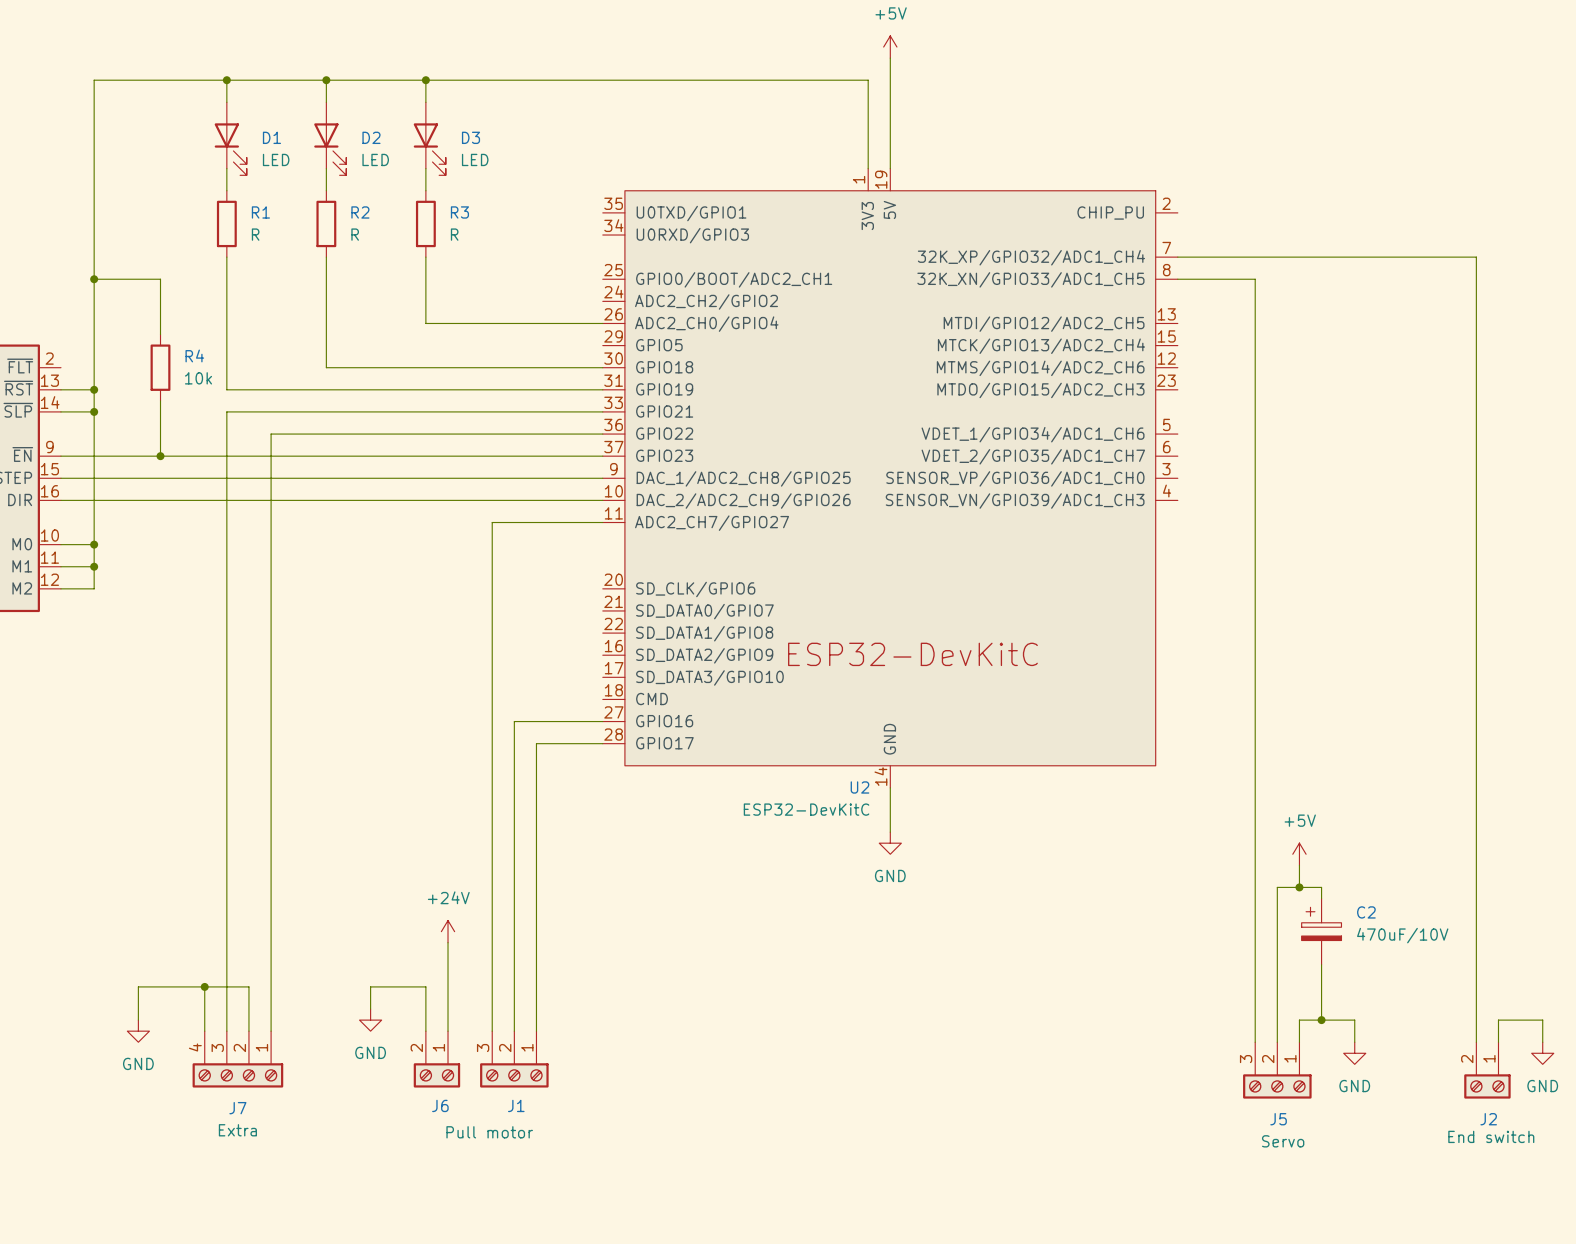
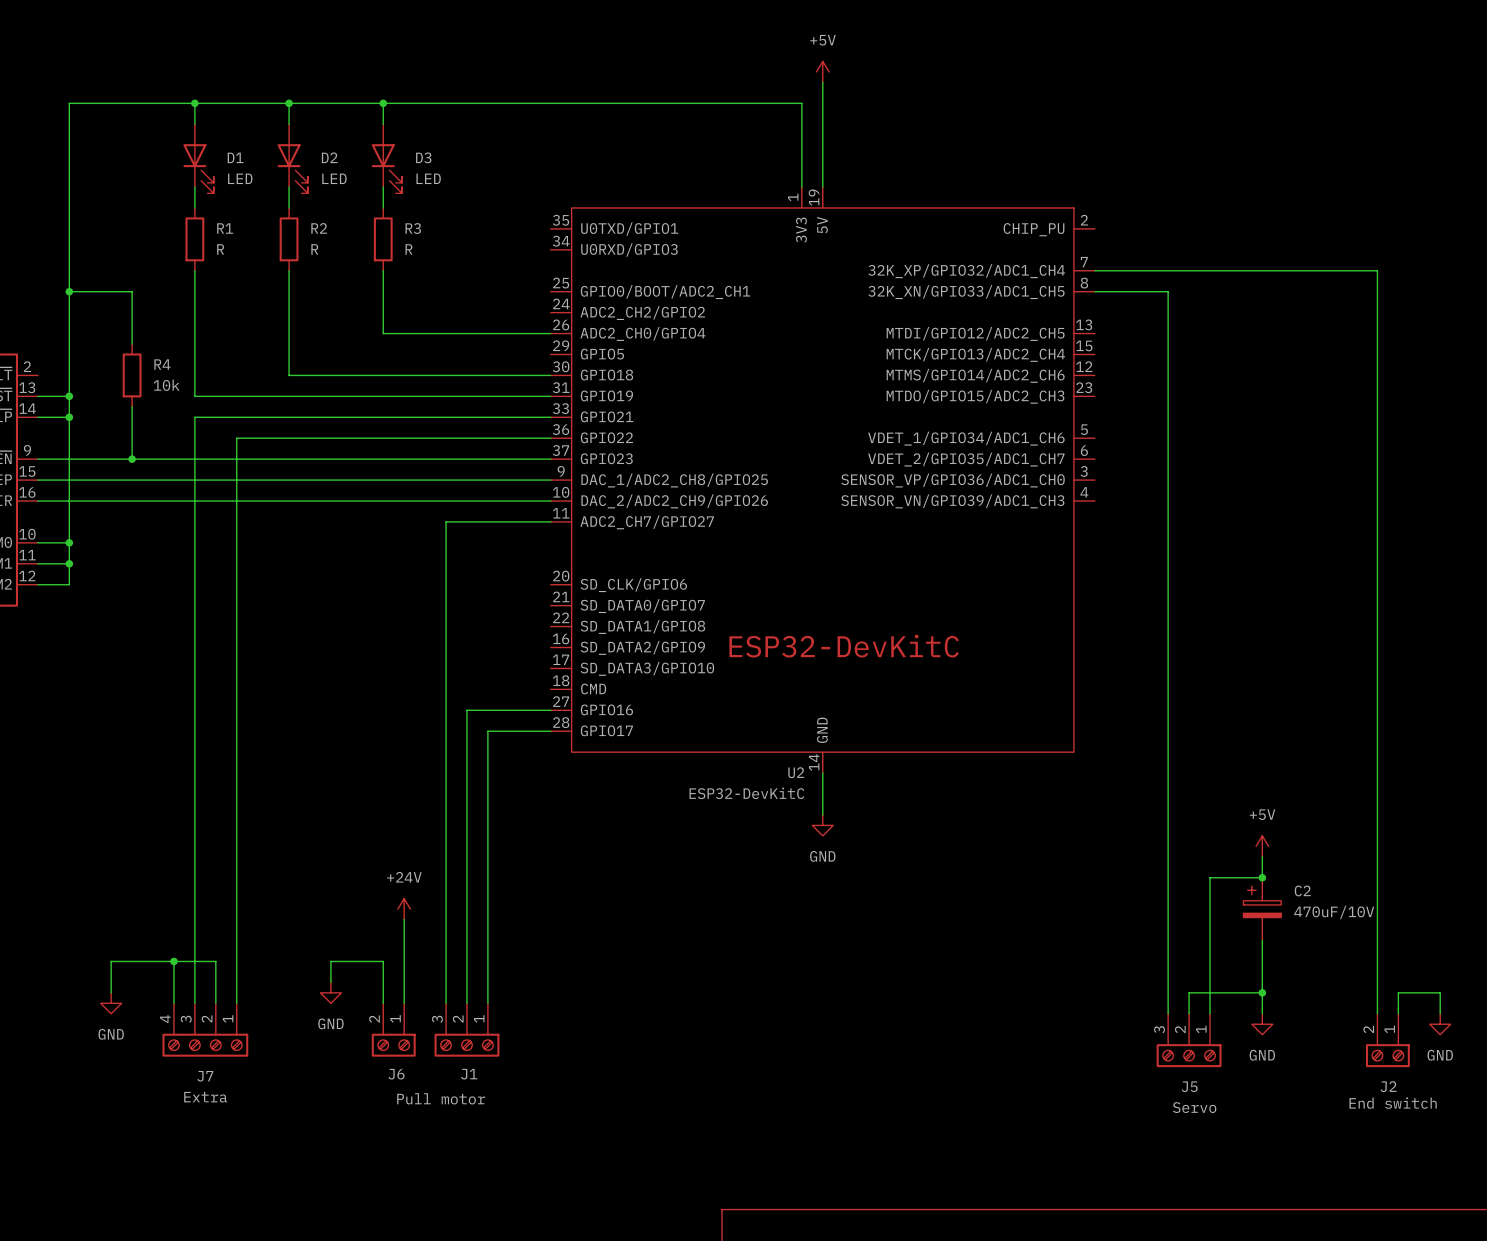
power symbol position: +5V (1299, 854) -> +5V (1262, 846)
wire: (1299, 865) (1299, 887) -> none
junction: (1299, 887) -> none
wire: (1321, 898) (1321, 887) (1277, 887) (1277, 1020) -> (1262, 856) (1262, 877) (1209, 877) (1209, 992) (1189, 992)
junction: none -> (1262, 877)
C2 position: (1321, 931) -> (1262, 909)
wire: (1321, 964) (1321, 1020) -> (1262, 940) (1262, 992)
junction position: (1321, 1020) -> (1262, 992)

